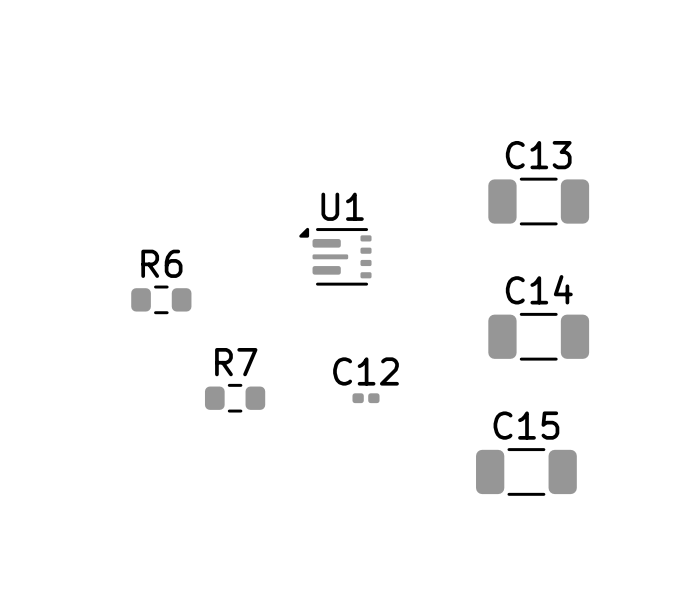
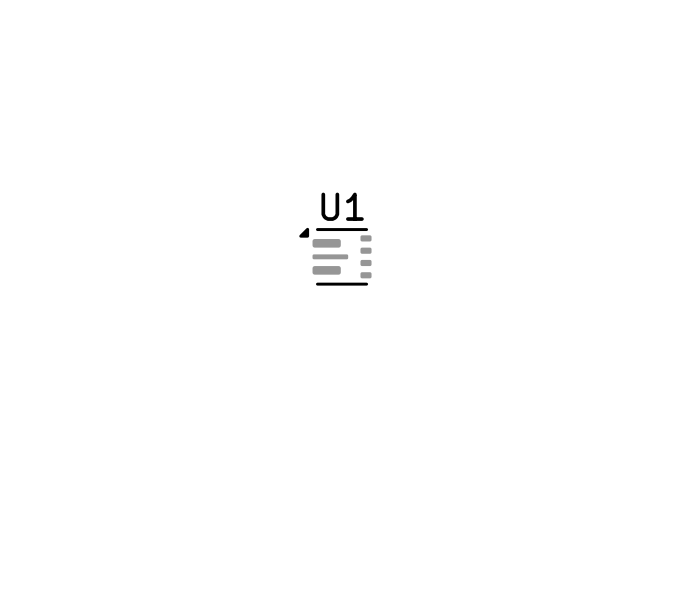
C13: (538, 201) -> none
R6: (161, 299) -> none
C14: (538, 336) -> none
R7: (235, 398) -> none
C12: (366, 398) -> none
C15: (526, 471) -> none

